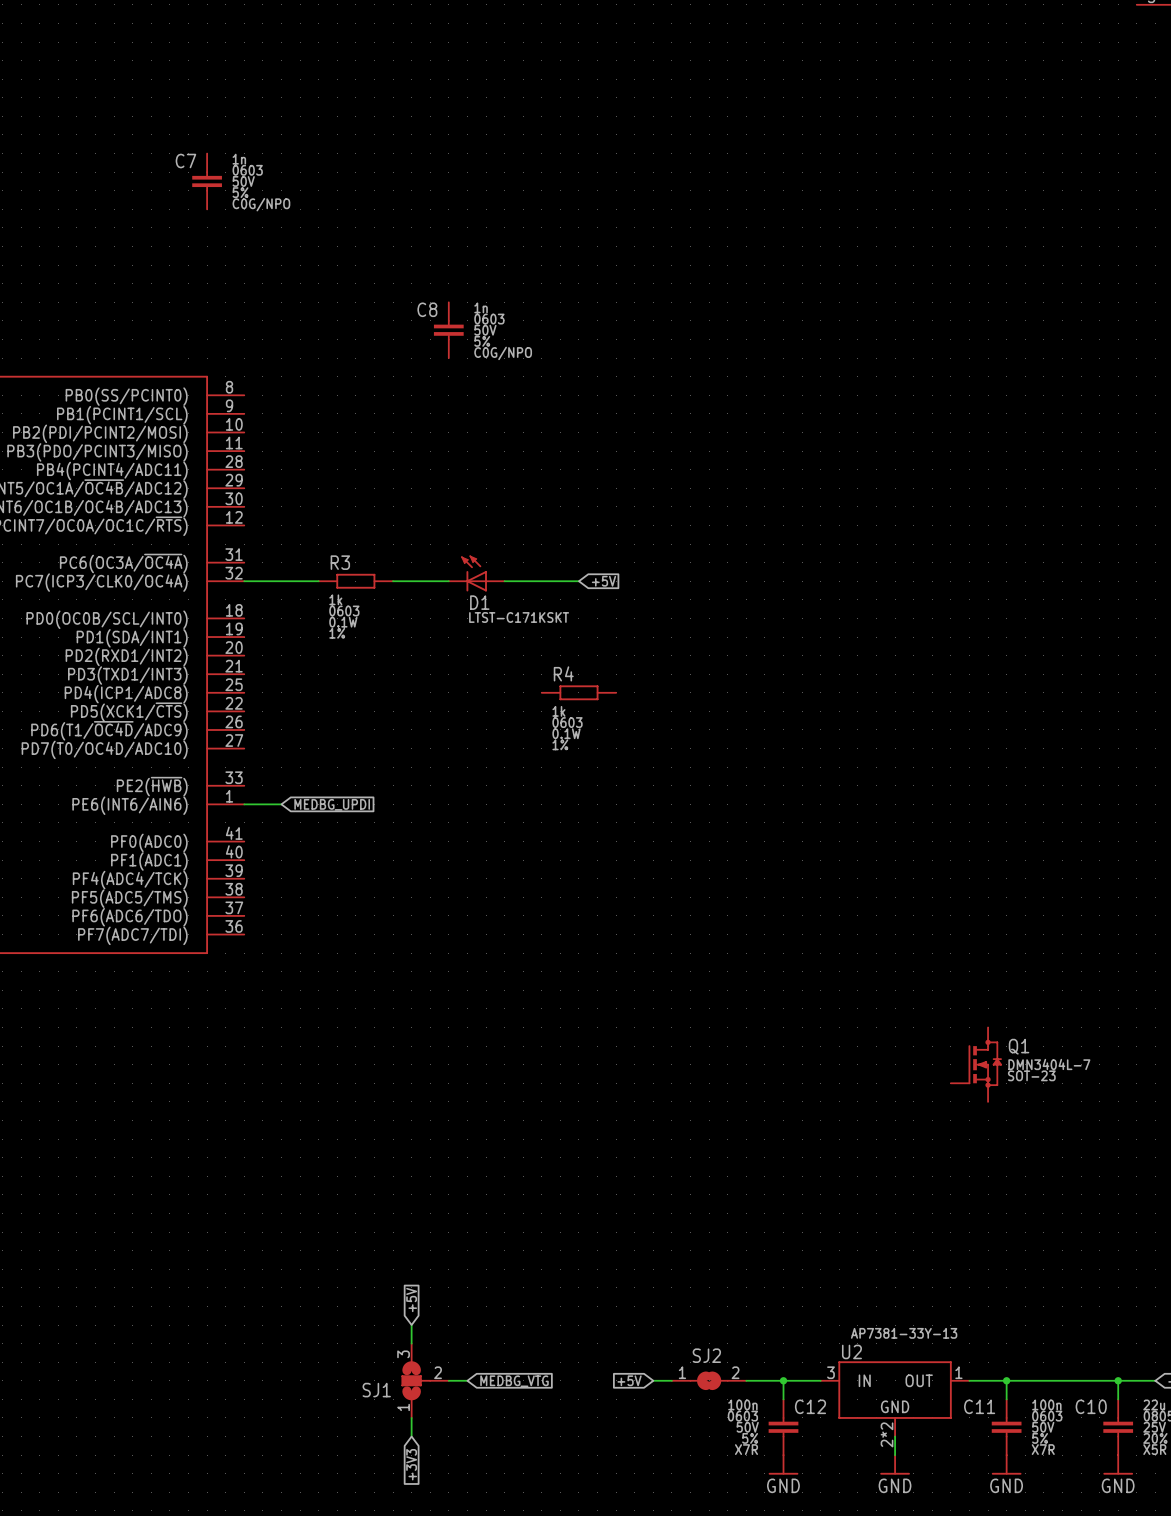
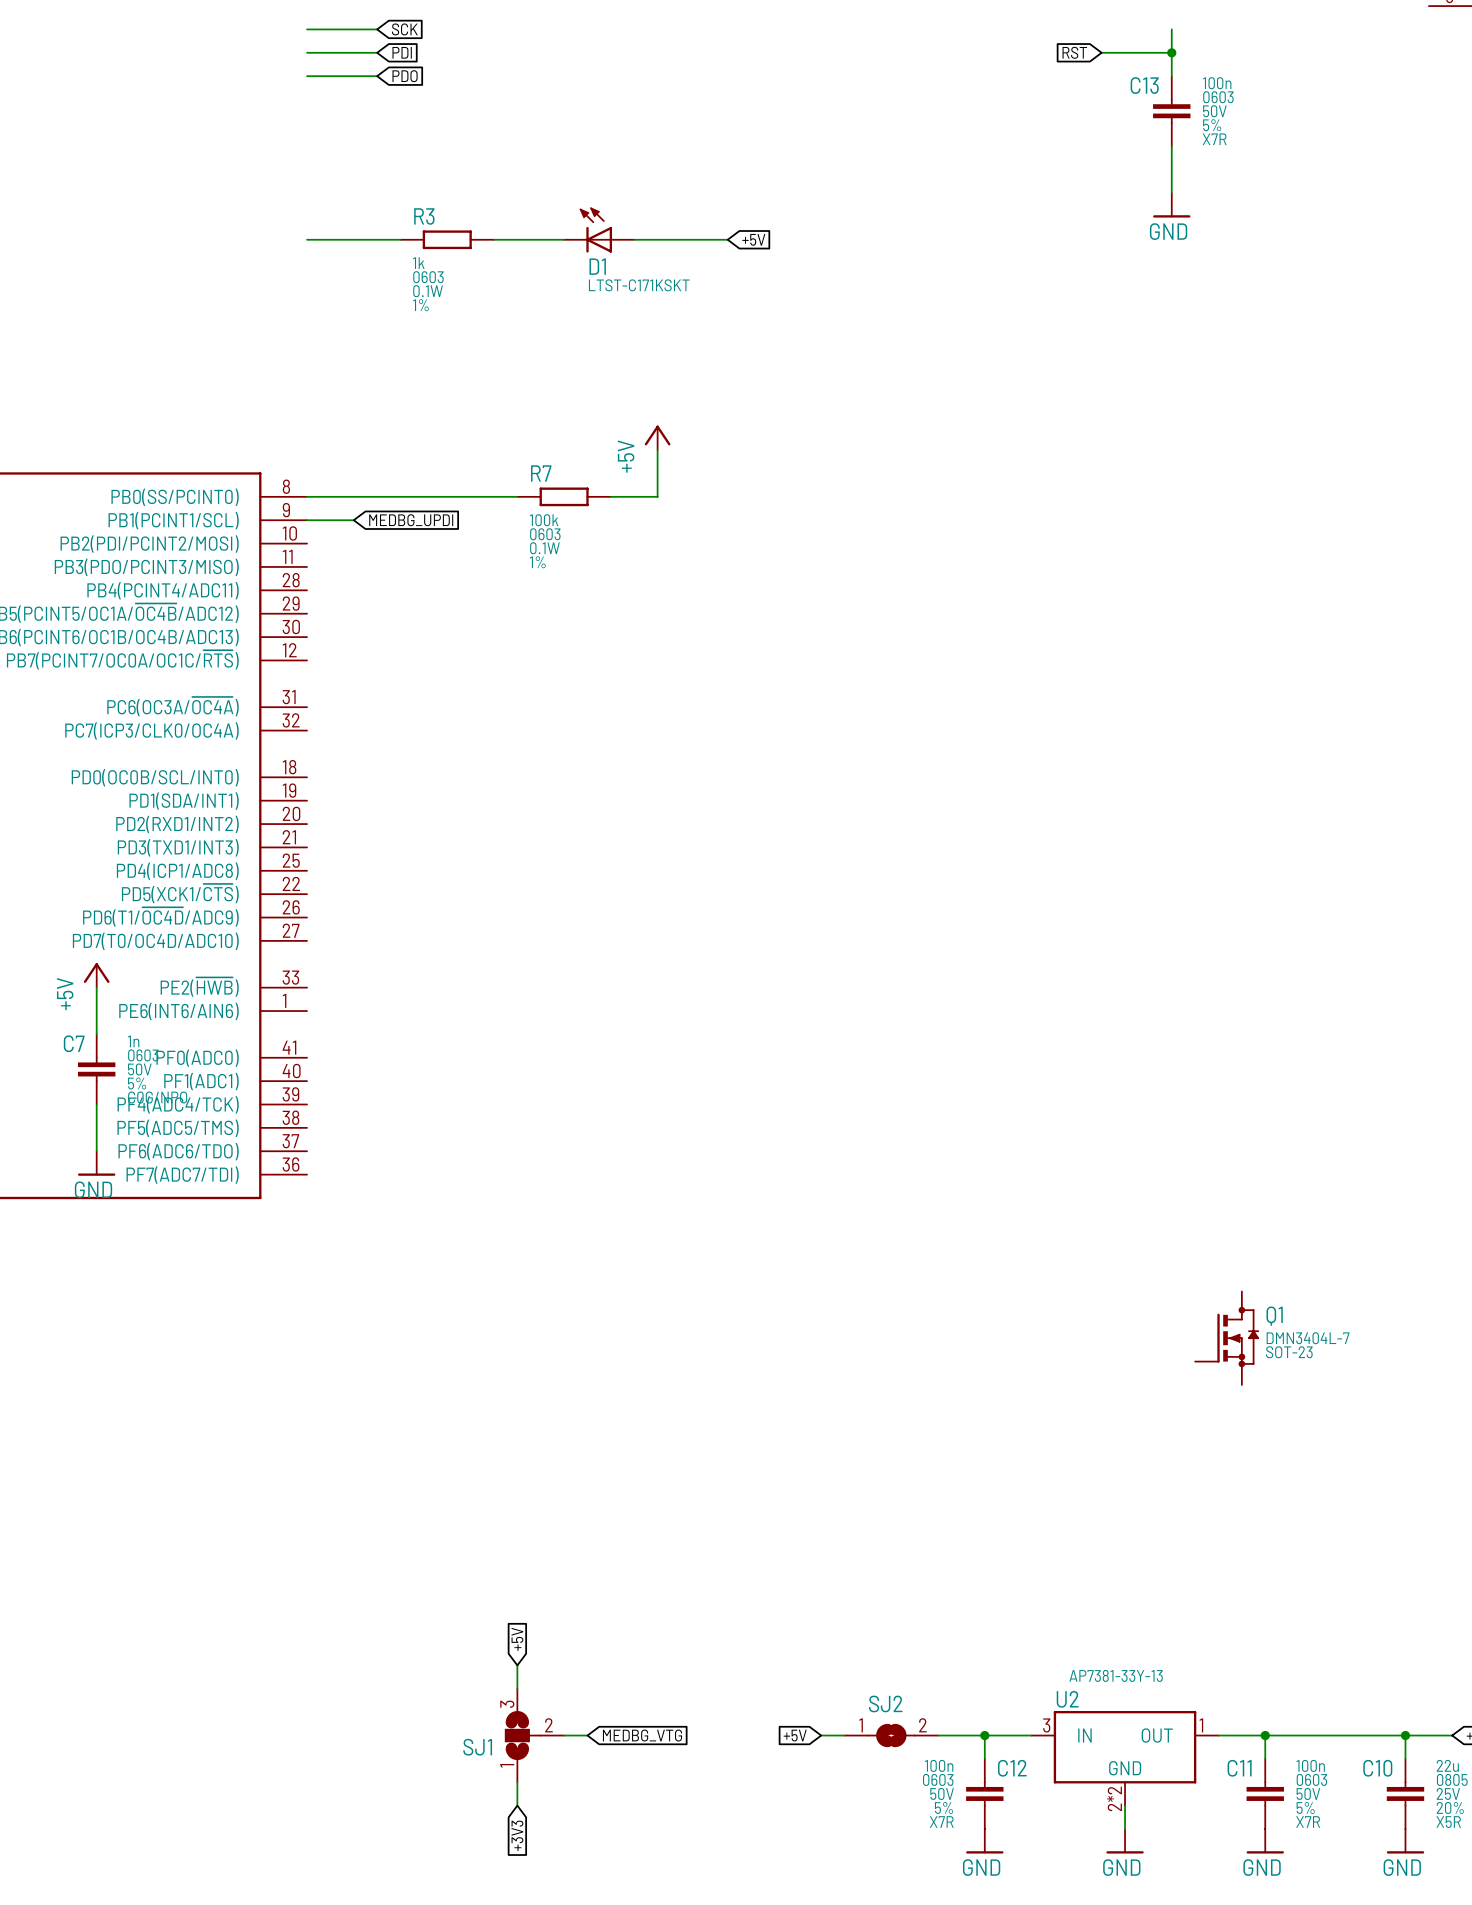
wire: none -> (307, 29) (377, 29)
global label: none -> SCK (404, 29)
wire: none -> (1171, 29) (1171, 76)
wire: none -> (307, 52) (377, 52)
global label: none -> PDI (402, 52)
global label: none -> RST (1074, 52)
wire: none -> (1101, 52) (1171, 52)
junction: none -> (1171, 52)
wire: none -> (307, 76) (377, 76)
global label: none -> PDO (405, 76)
C13: none -> 100n (1171, 111)
wire: none -> (1171, 146) (1171, 193)
power symbol: none -> GND (1171, 205)
C7 position: (207, 181) -> (96, 1069)
wire: none -> (307, 239) (400, 239)
wire: none -> (494, 239) (564, 239)
wire: none -> (634, 239) (727, 239)
global label: none -> +5V (753, 239)
C8: 1n (448, 330) -> none
power symbol: none -> +5V (657, 437)
wire: none -> (657, 450) (657, 496) (610, 496)
wire: none -> (307, 496) (517, 496)
R7: none -> 100k (564, 496)
wire: none -> (307, 520) (353, 520)
global label: none -> MEDBG_UPDI (411, 520)
D1 position: (476, 573) -> (599, 230)
wire: (244, 581) (318, 581) -> none
R3 position: (355, 581) -> (447, 239)
wire: (393, 581) (448, 581) -> none
wire: (504, 581) (578, 581) -> none
global label: +5V (603, 581) -> none
R4: 1k (578, 692) -> none
power symbol: none -> +5V (96, 975)
wire: none -> (96, 987) (96, 1034)
wire: (244, 804) (281, 804) -> none
global label: MEDBG_UPDI (332, 804) -> none
wire: none -> (96, 1104) (96, 1151)
power symbol: none -> GND (96, 1163)

